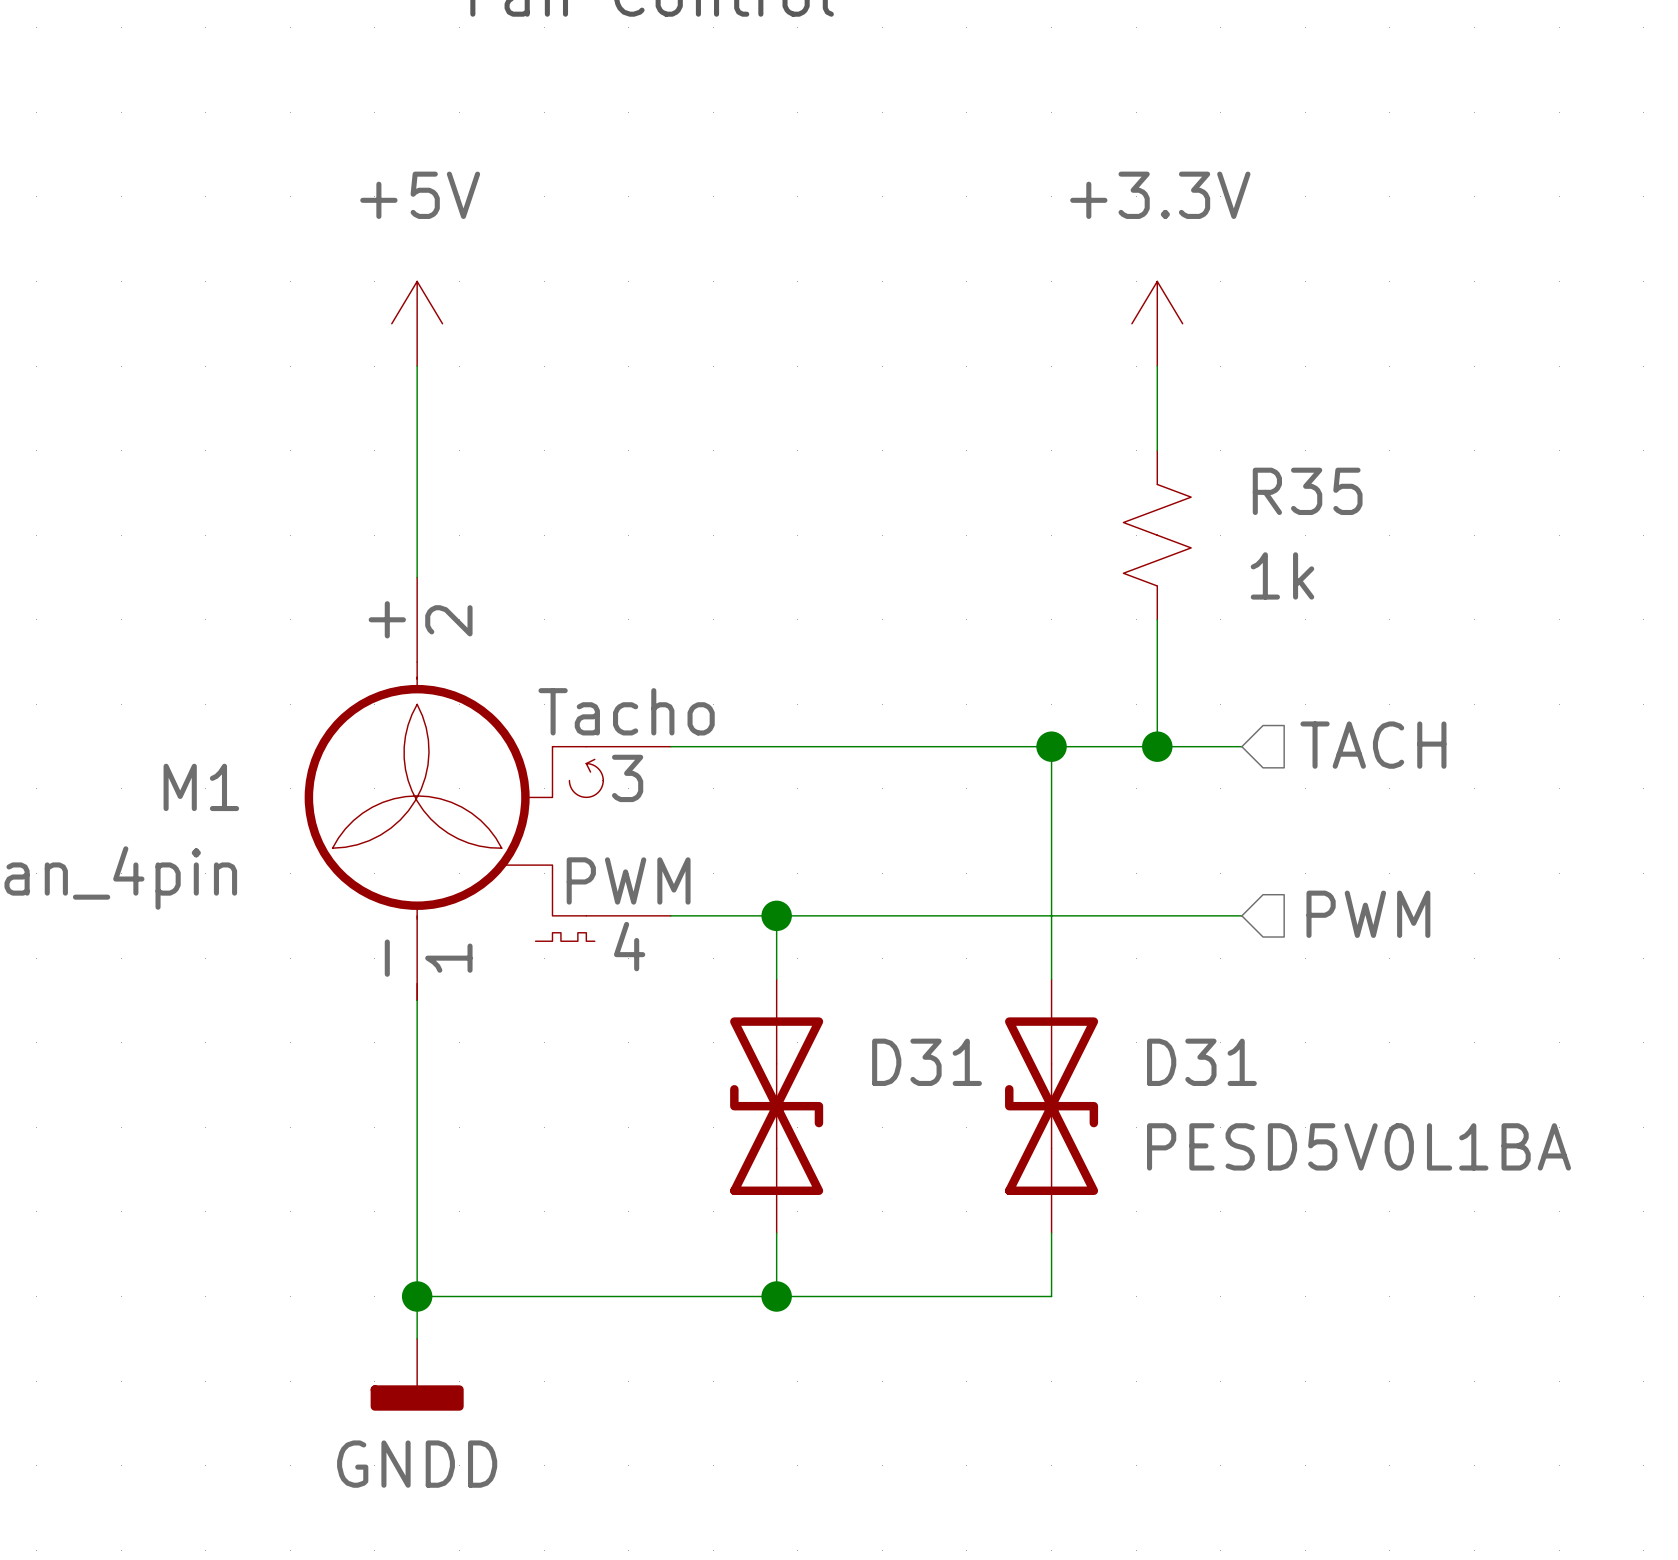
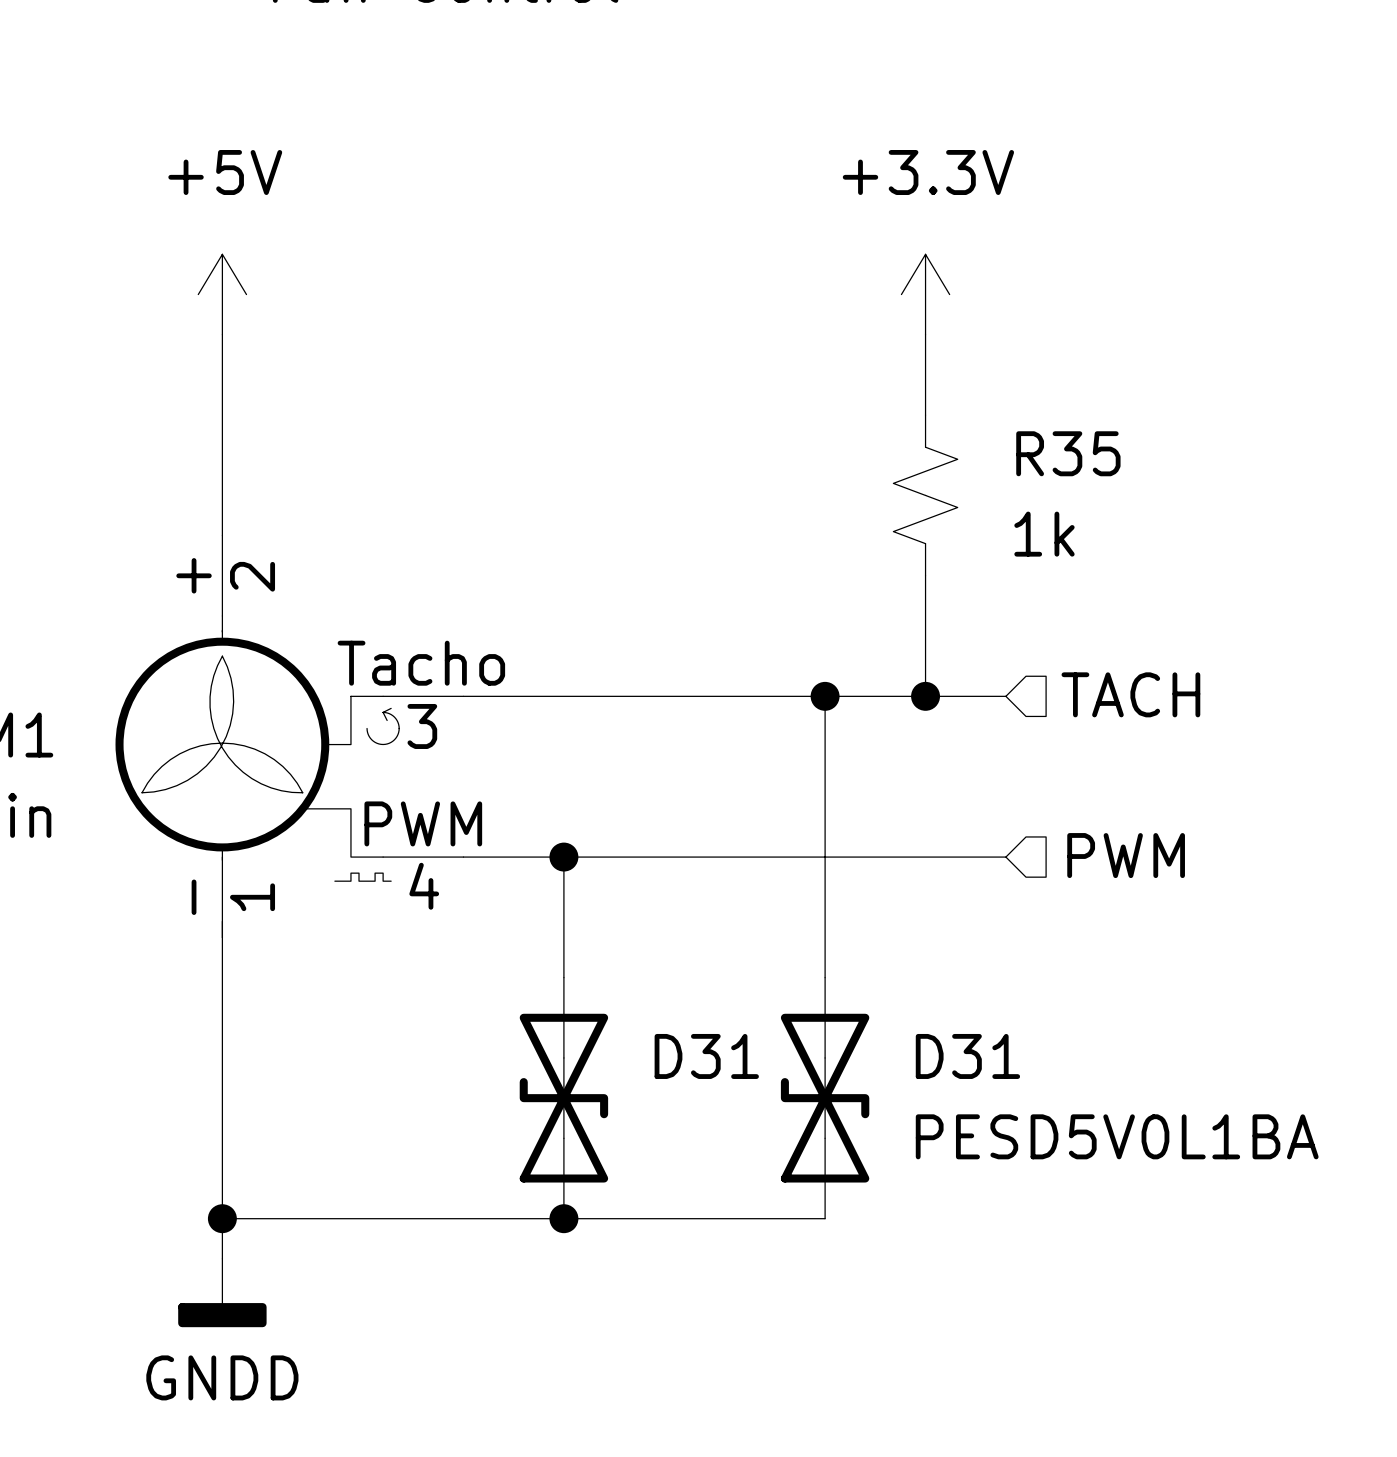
D31 position: (776, 1106) -> (563, 1098)
D31 position: (1051, 1106) -> (825, 1098)

